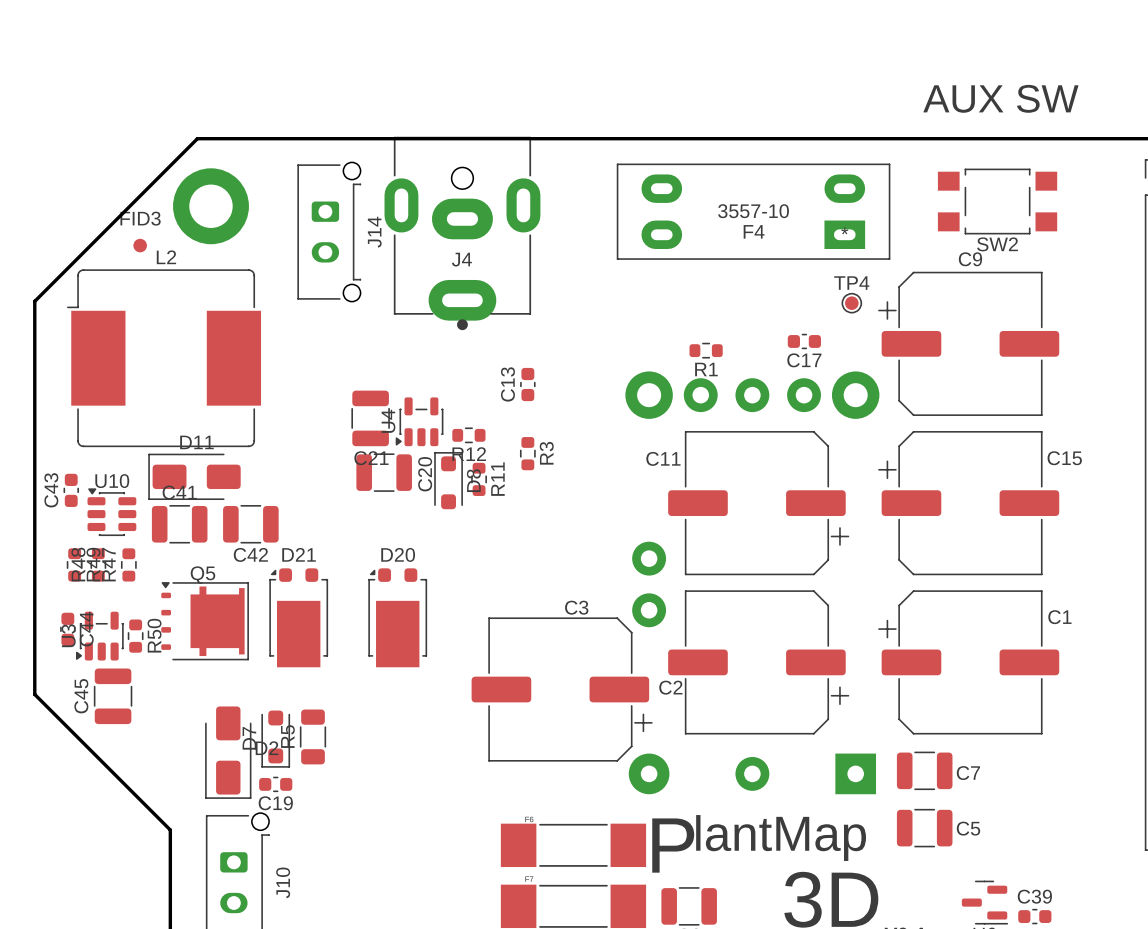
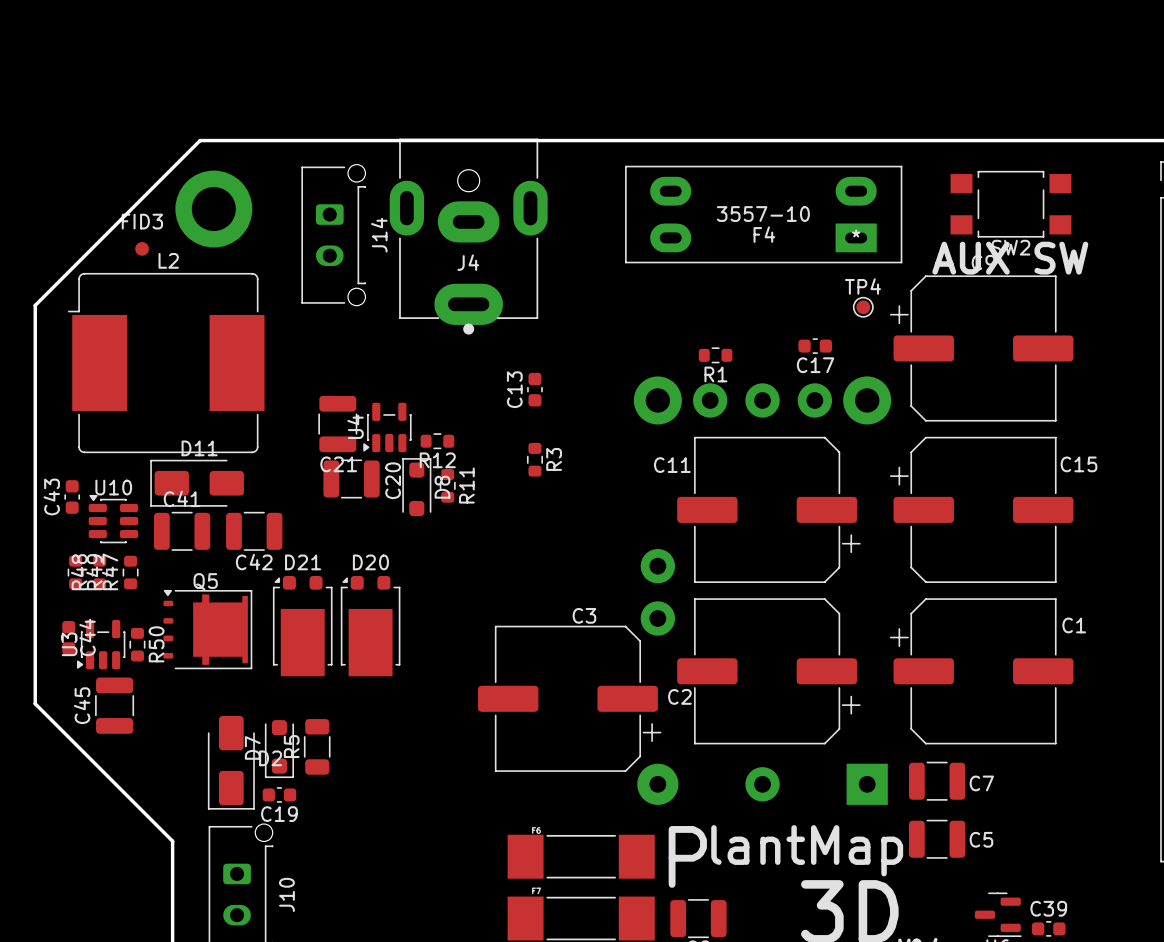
text position: AUX SW (1000, 98) -> AUX SW (1010, 258)
C21 position: (370, 418) -> (337, 424)
U4 position: (419, 421) -> (387, 427)
R12 position: (468, 435) -> (437, 441)
C20 position: (384, 472) -> (351, 478)
R11 position: (479, 479) -> (447, 485)
D8 position: (448, 480) -> (416, 487)
D20 position: (397, 617) -> (370, 626)

